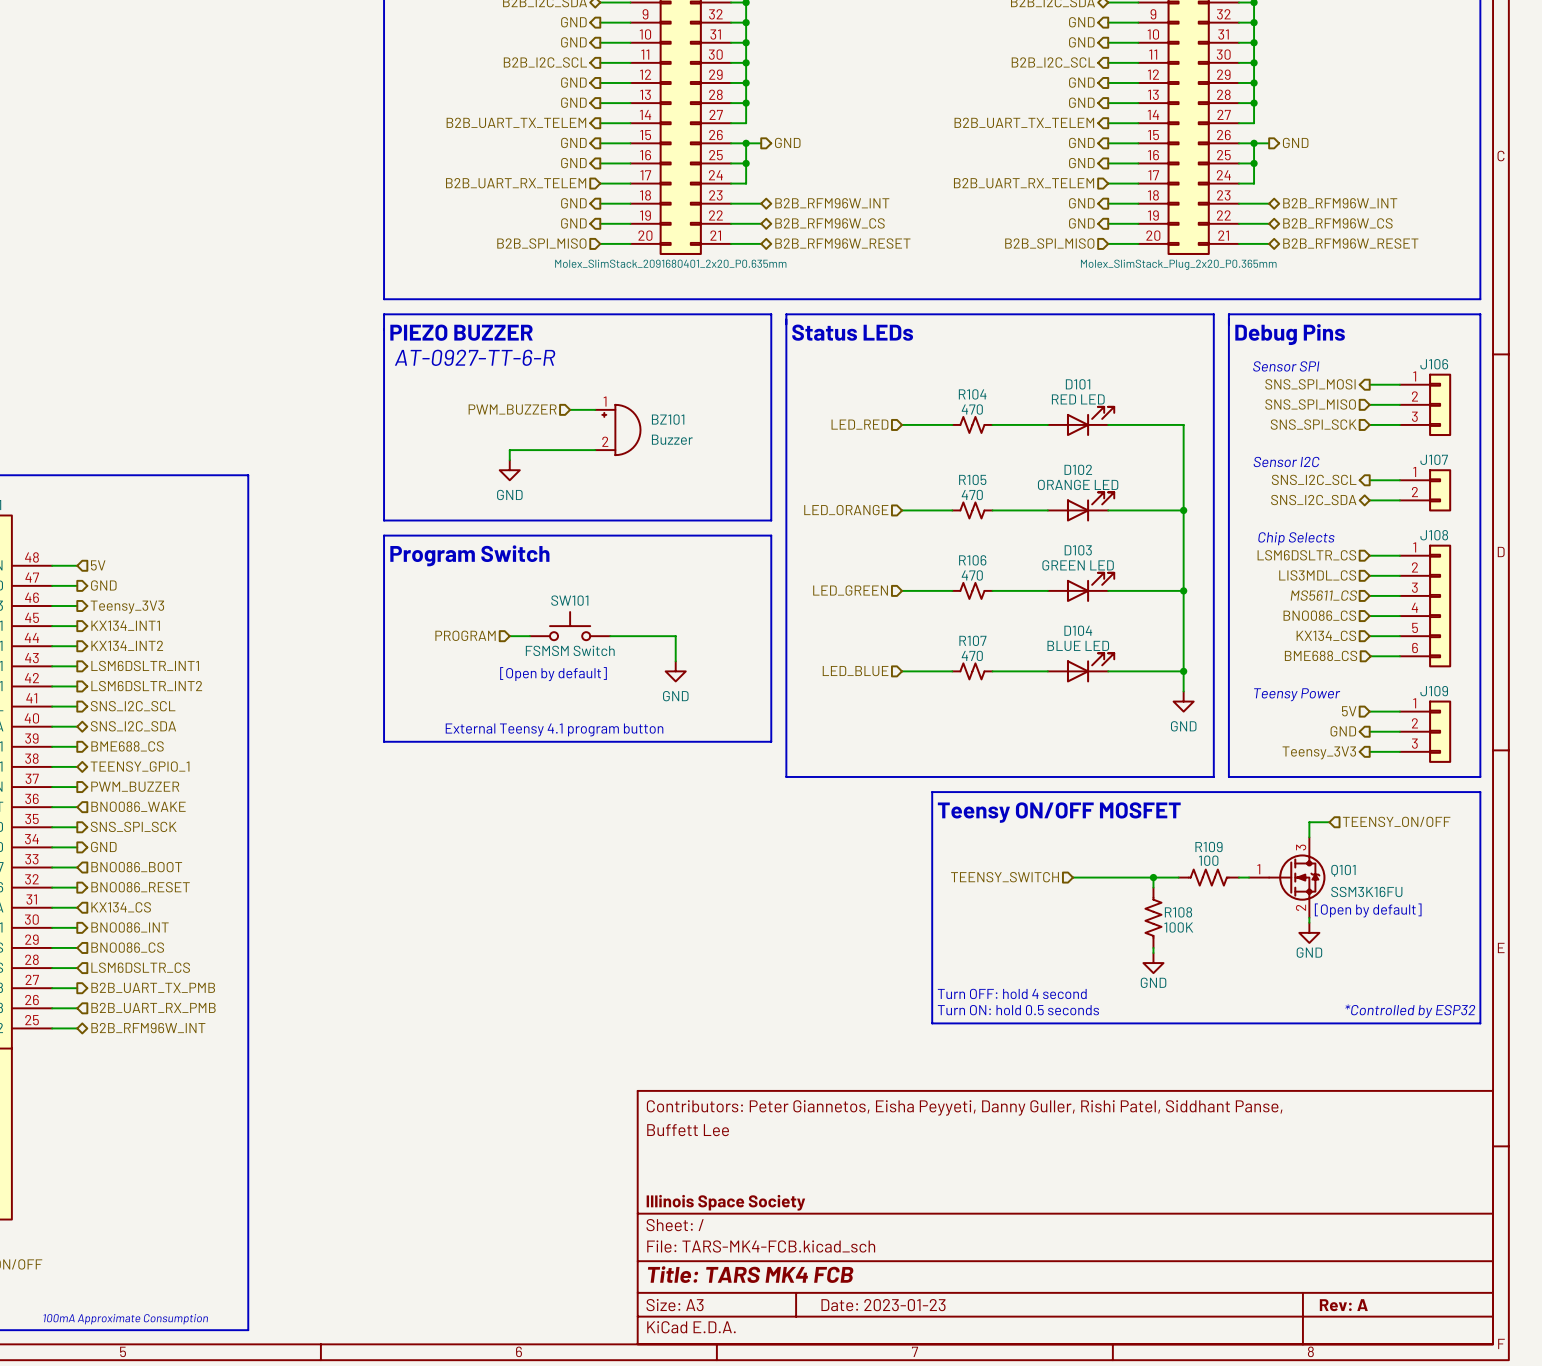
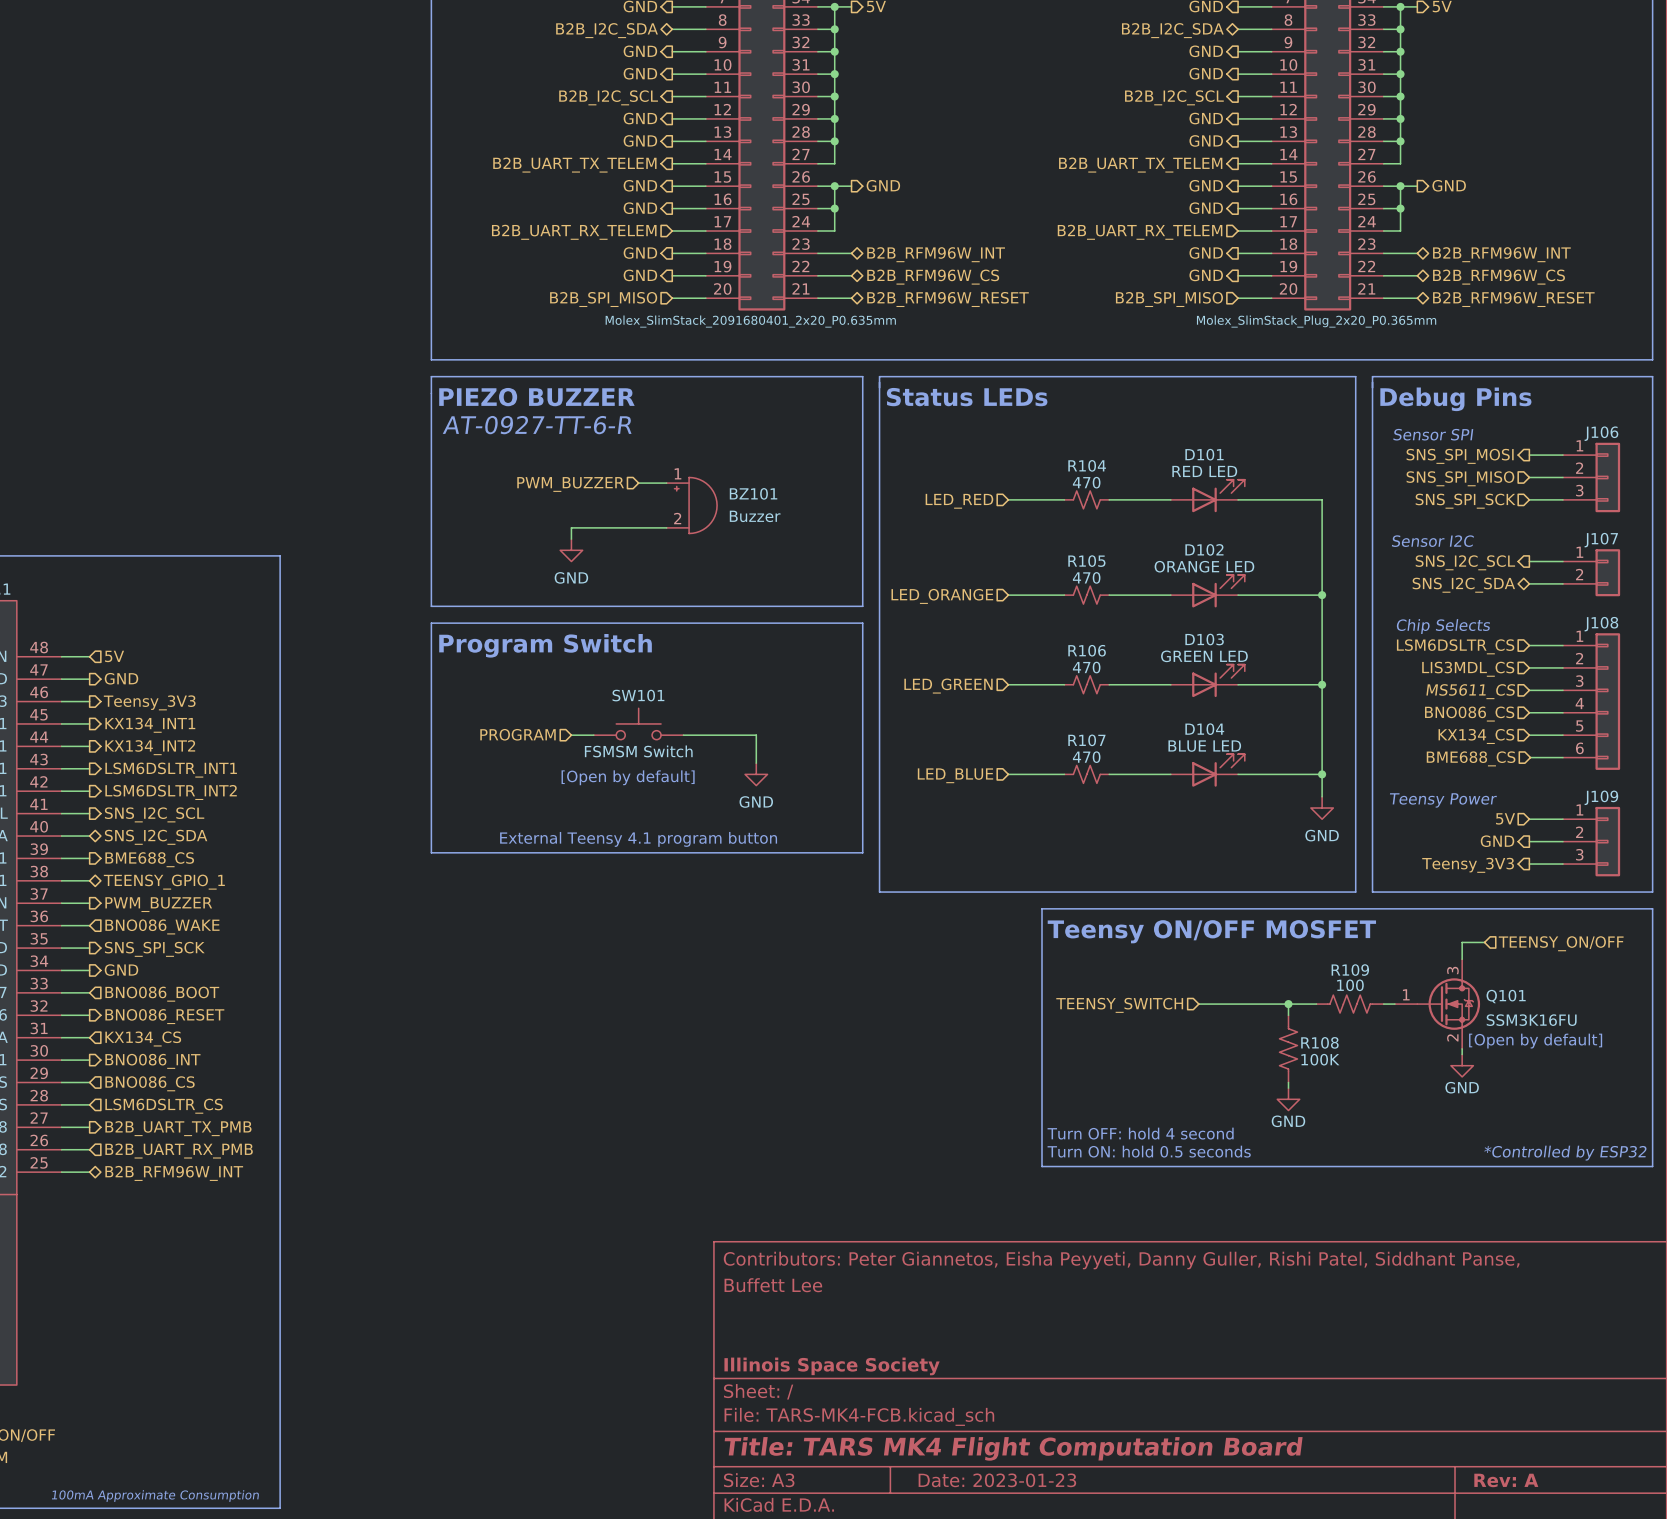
title block: Title: TARS MK4 FCB (750, 1274) -> Title: TARS MK4 Flight Computation Board (1013, 1448)

